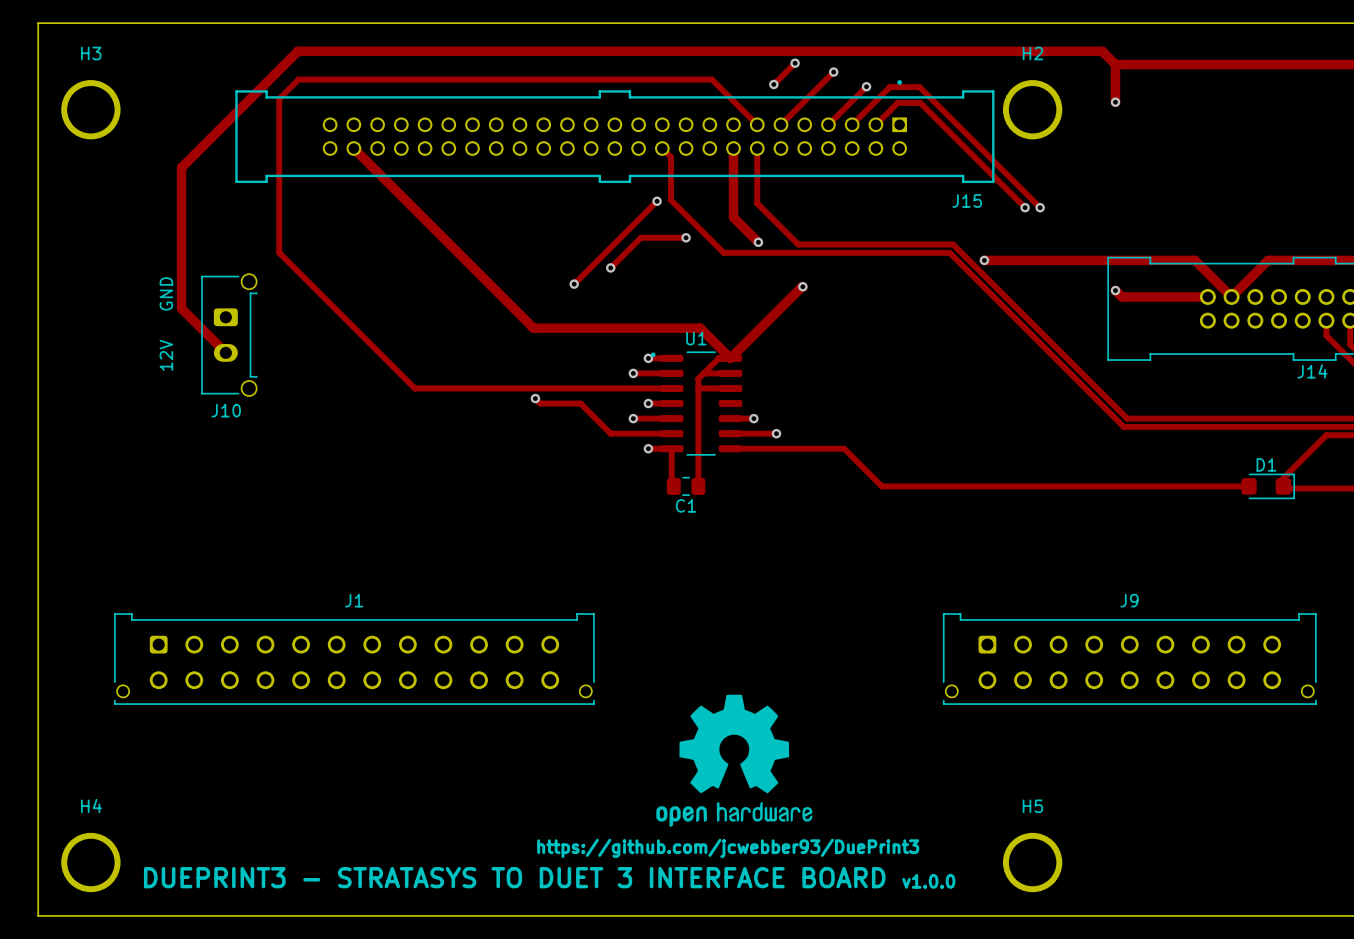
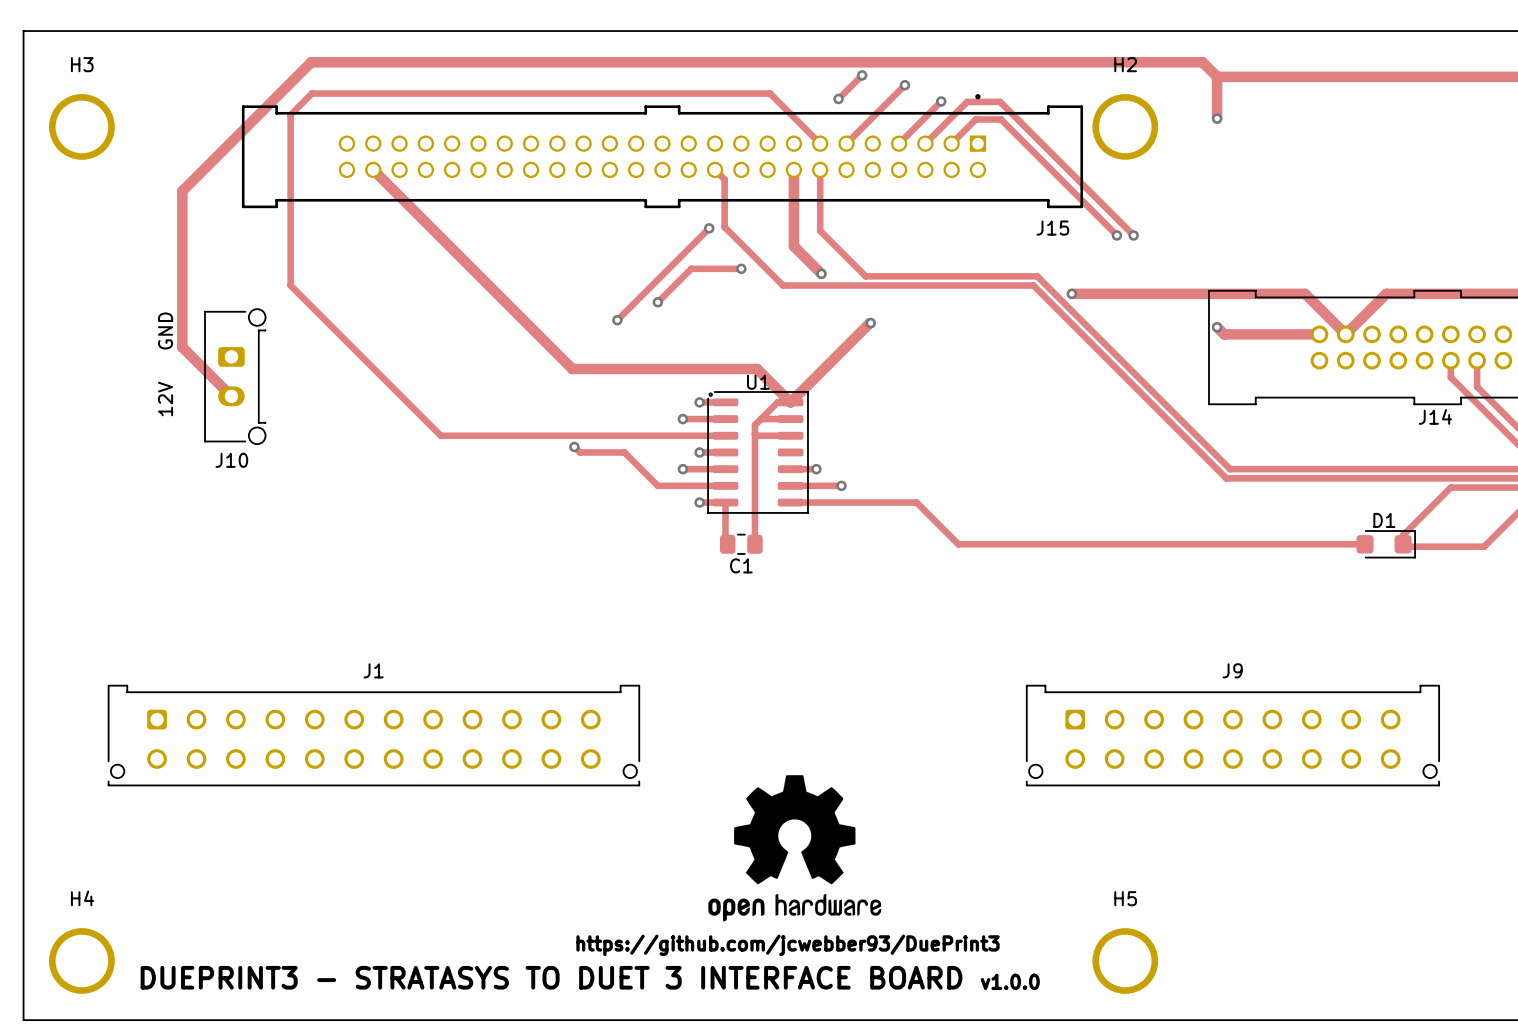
U1 footprint: [650, 351, 743, 456] -> [707, 391, 809, 514]

